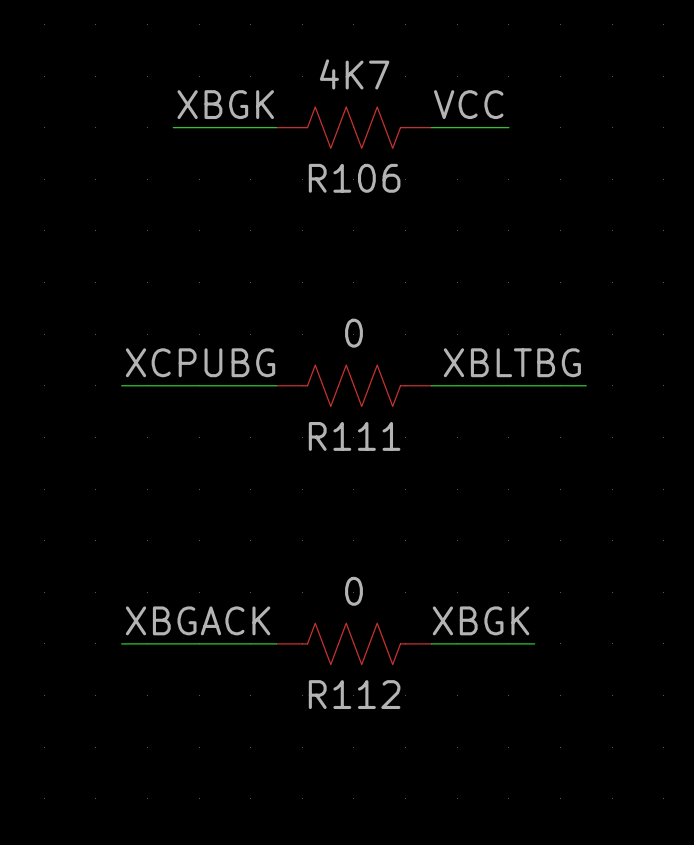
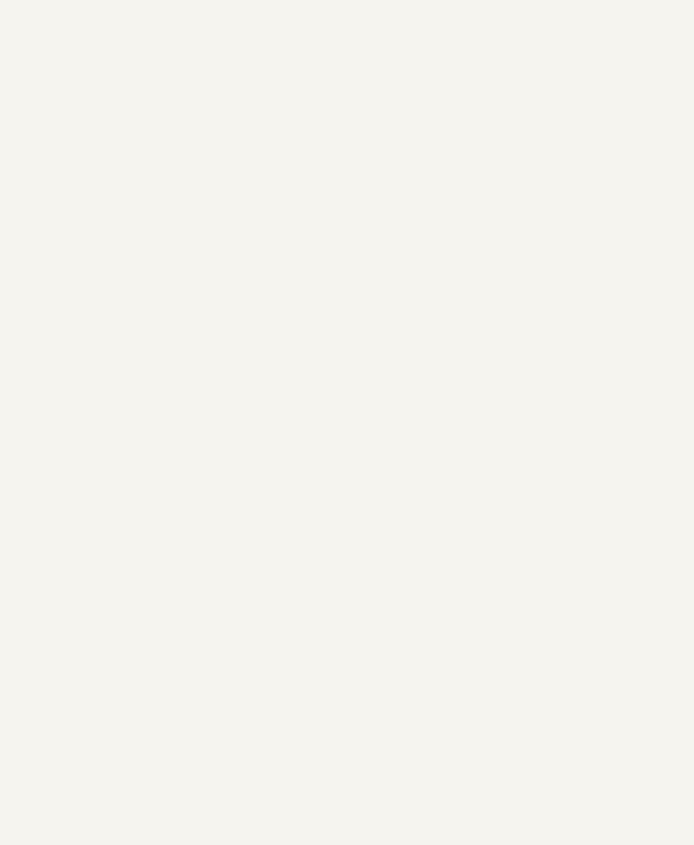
label: XBGK (225, 104) -> none
label: VCC (468, 104) -> none
wire: (173, 127) (276, 127) -> none
R106: 4K7 (353, 127) -> none
wire: (431, 127) (508, 127) -> none
label: XCPUBG (200, 362) -> none
label: XBLTBG (512, 362) -> none
wire: (121, 385) (276, 385) -> none
R111: 0 (353, 385) -> none
wire: (431, 385) (586, 385) -> none
label: XBGACK (198, 620) -> none
label: XBGK (481, 620) -> none
wire: (121, 643) (276, 643) -> none
R112: 0 (353, 643) -> none
wire: (431, 643) (534, 643) -> none

